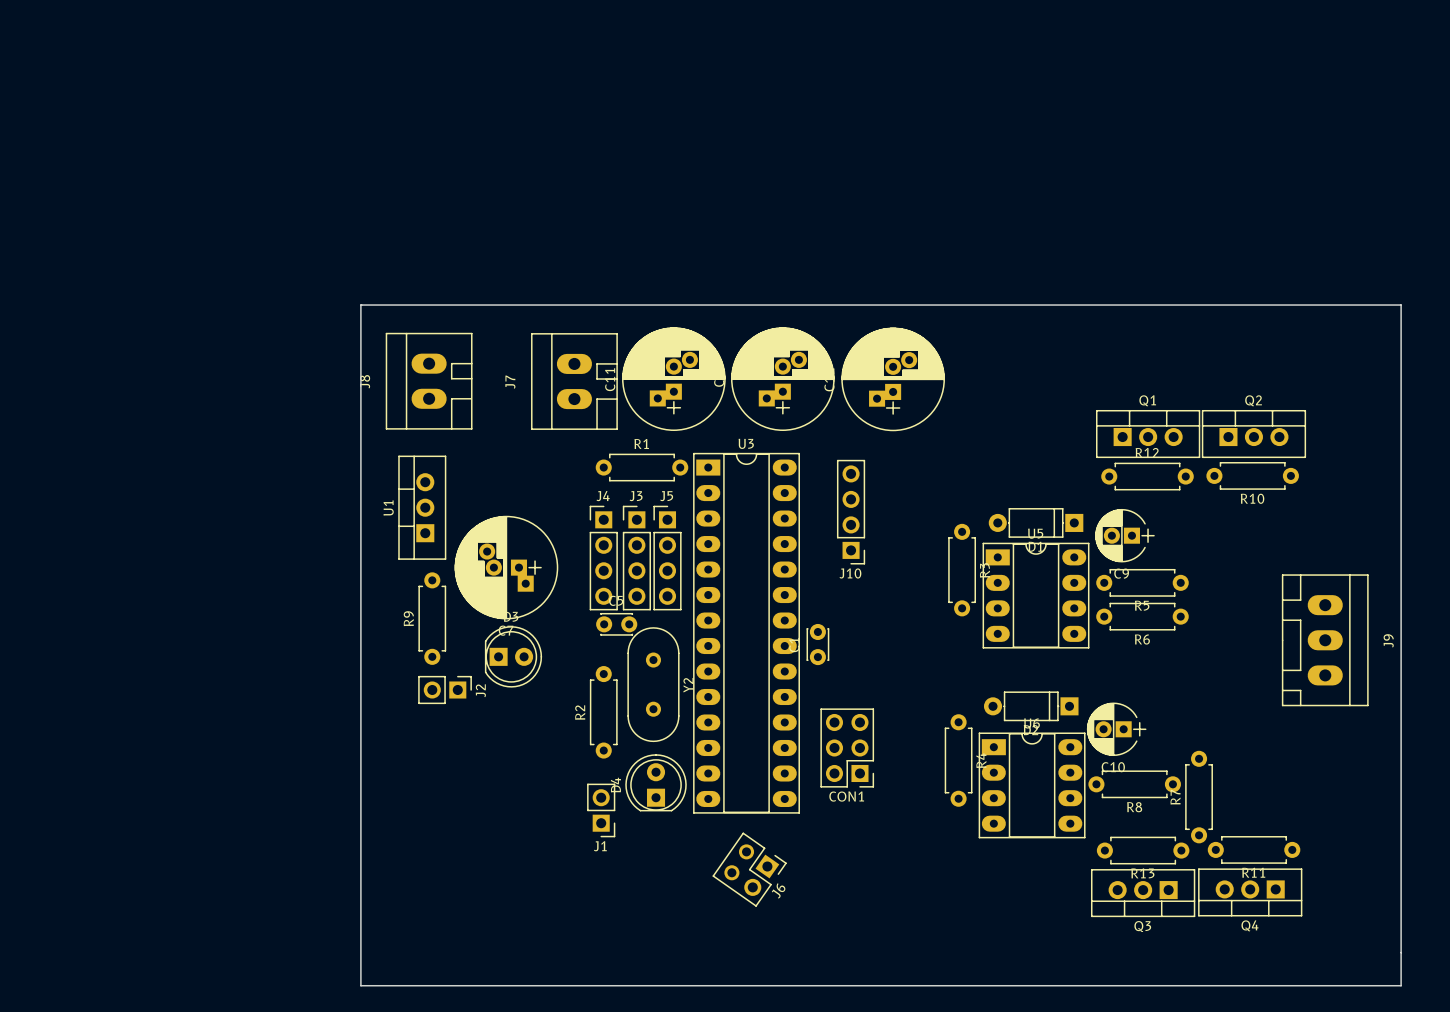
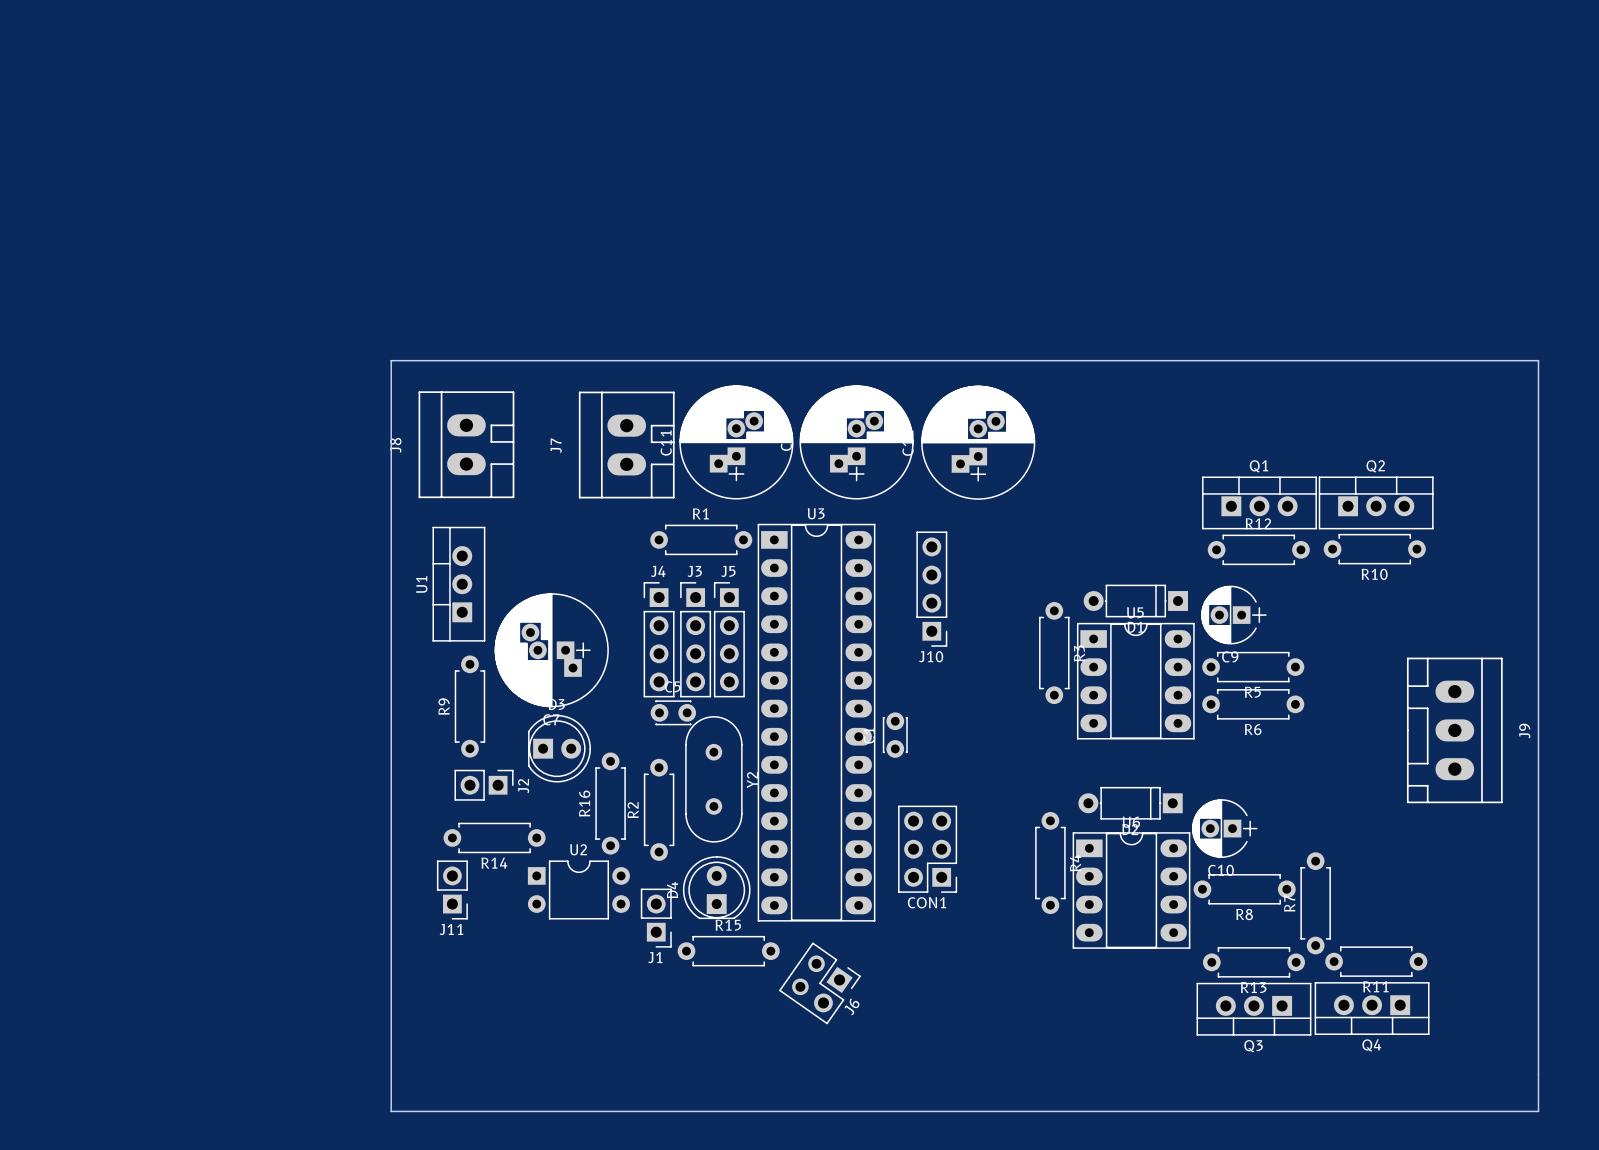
R16: none -> (610, 803)
R14: none -> (494, 837)
J11: none -> (452, 889)
U2: none -> (578, 889)
R15: none -> (728, 951)

